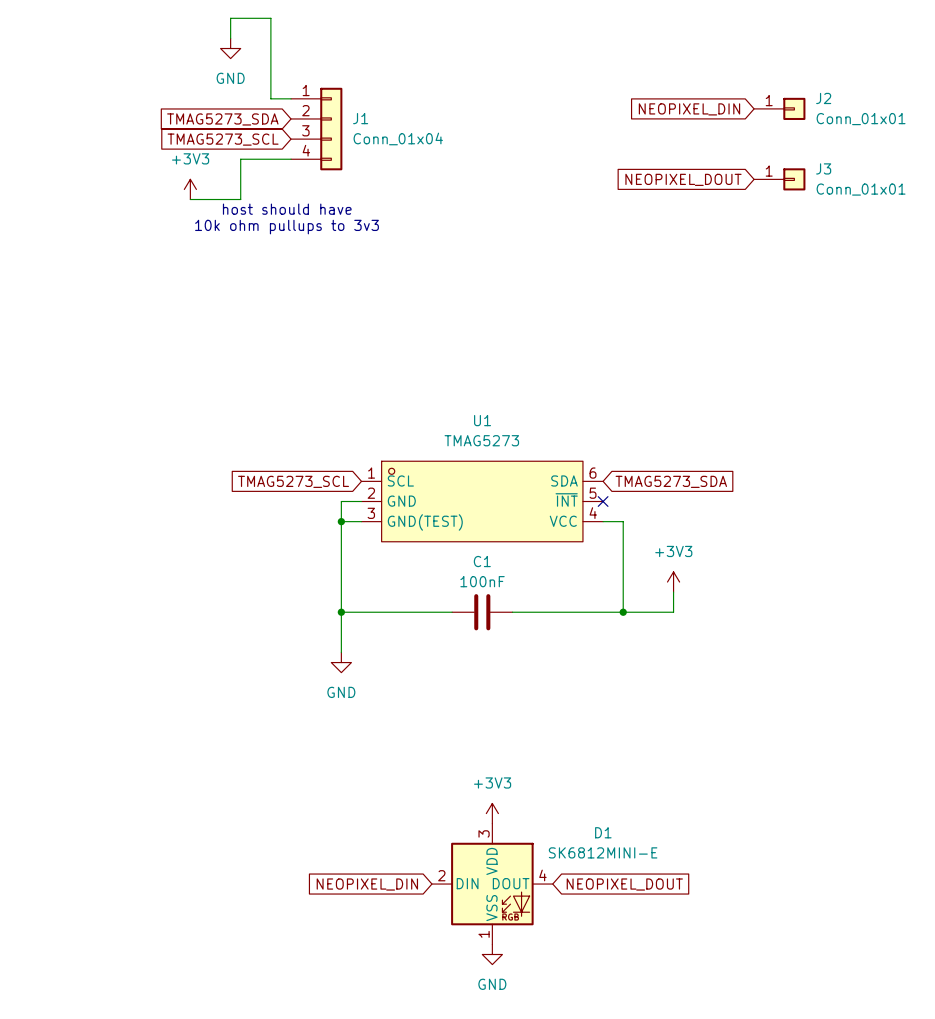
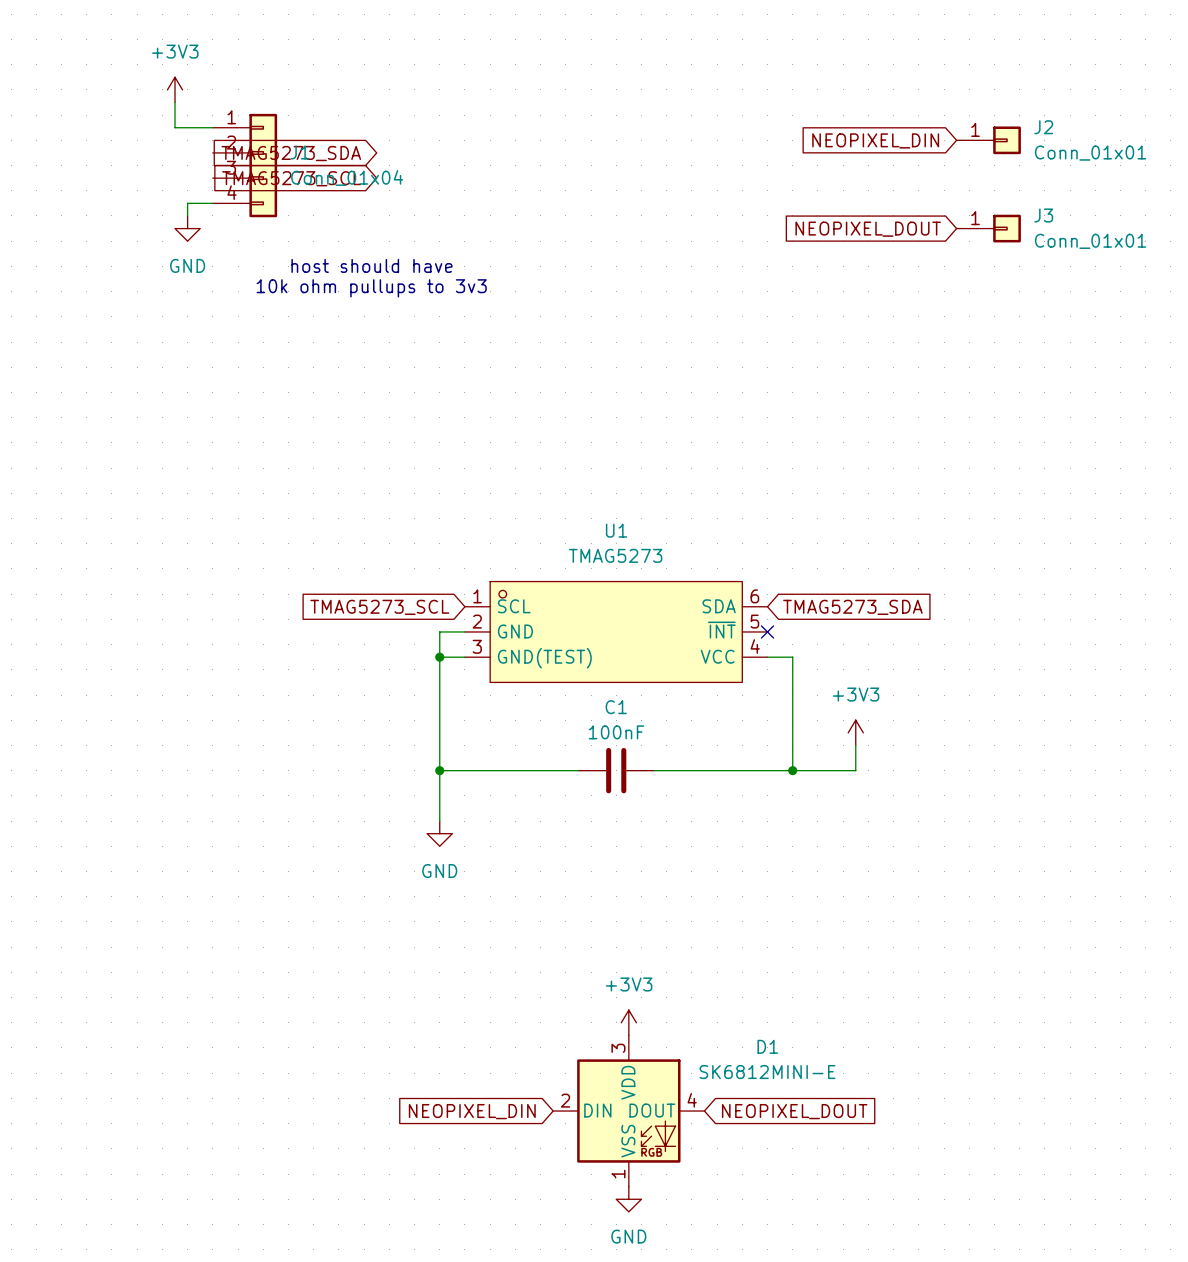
wire: (230, 38) (230, 18) (270, 18) (270, 98) (291, 98) -> none
power symbol position: GND (230, 48) -> GND (187, 228)
wire: none -> (175, 102) (175, 127) (212, 127)
J1 position: (316, 129) -> (244, 165)
wire: none -> (212, 203) (187, 203) (187, 215)
wire: (291, 159) (240, 159) (240, 199) (190, 199) -> none
power symbol position: +3V3 (190, 189) -> +3V3 (175, 89)

